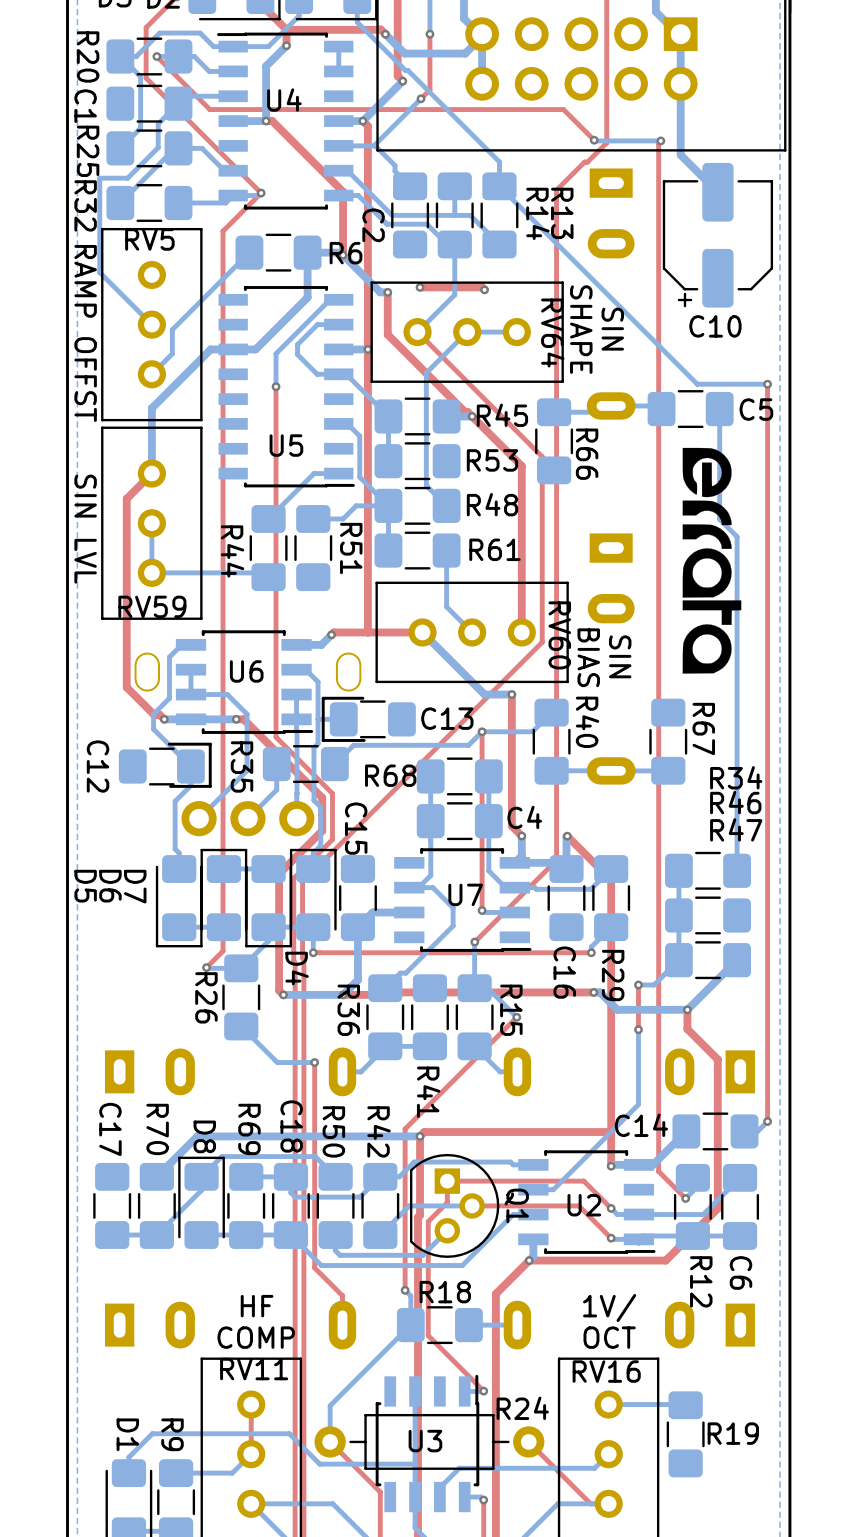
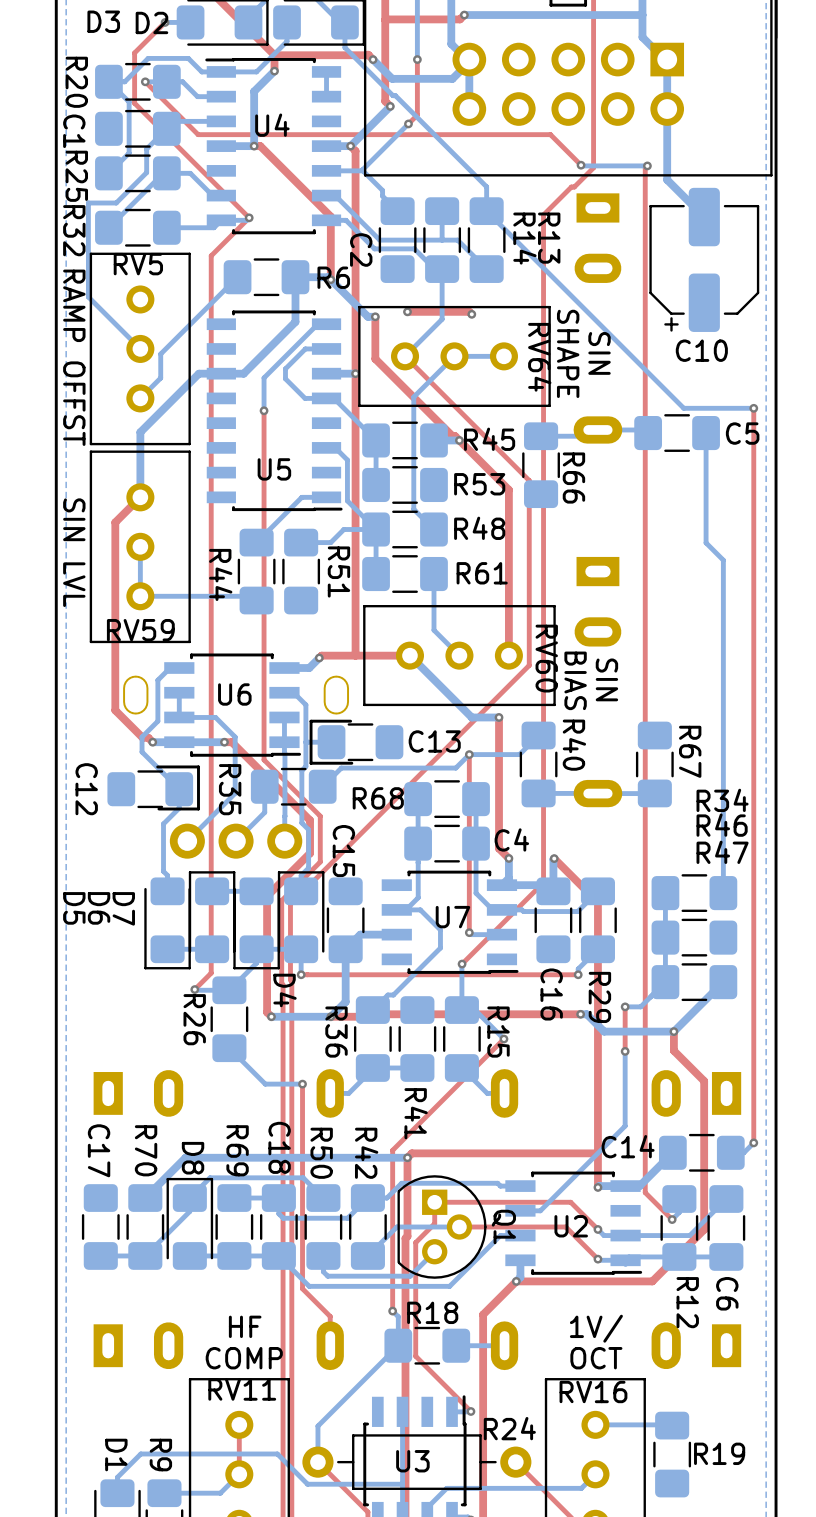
drawing: [682, 447, 742, 674] -> none

